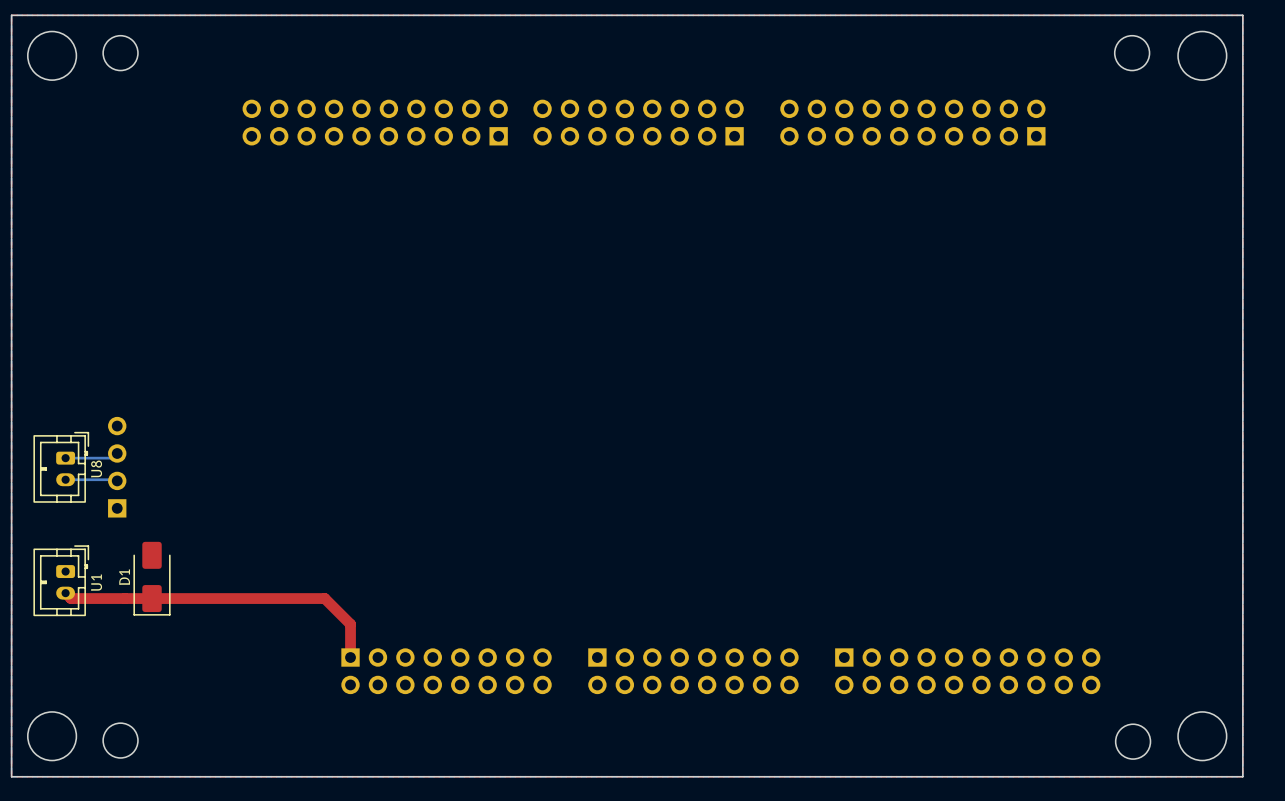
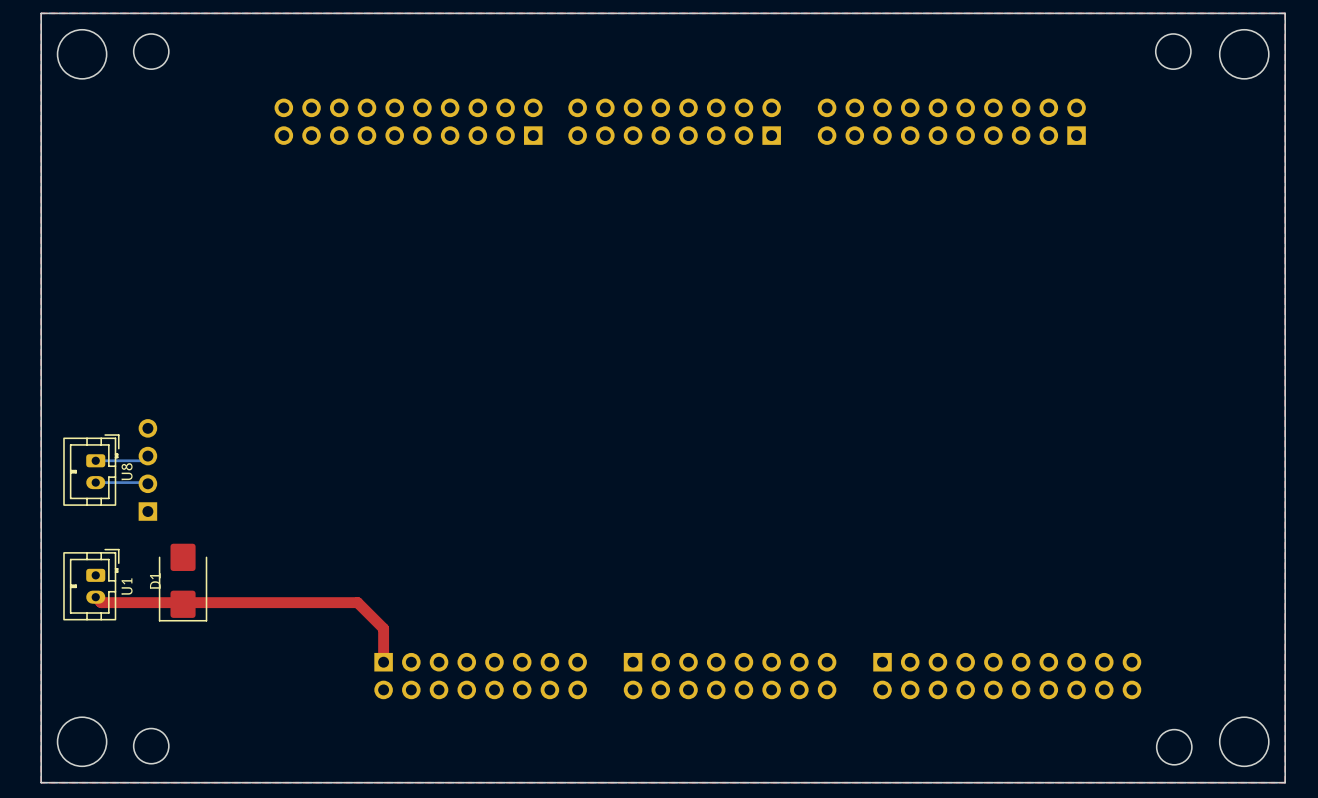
D1 footprint: [133, 541, 171, 616] -> [158, 543, 208, 622]

